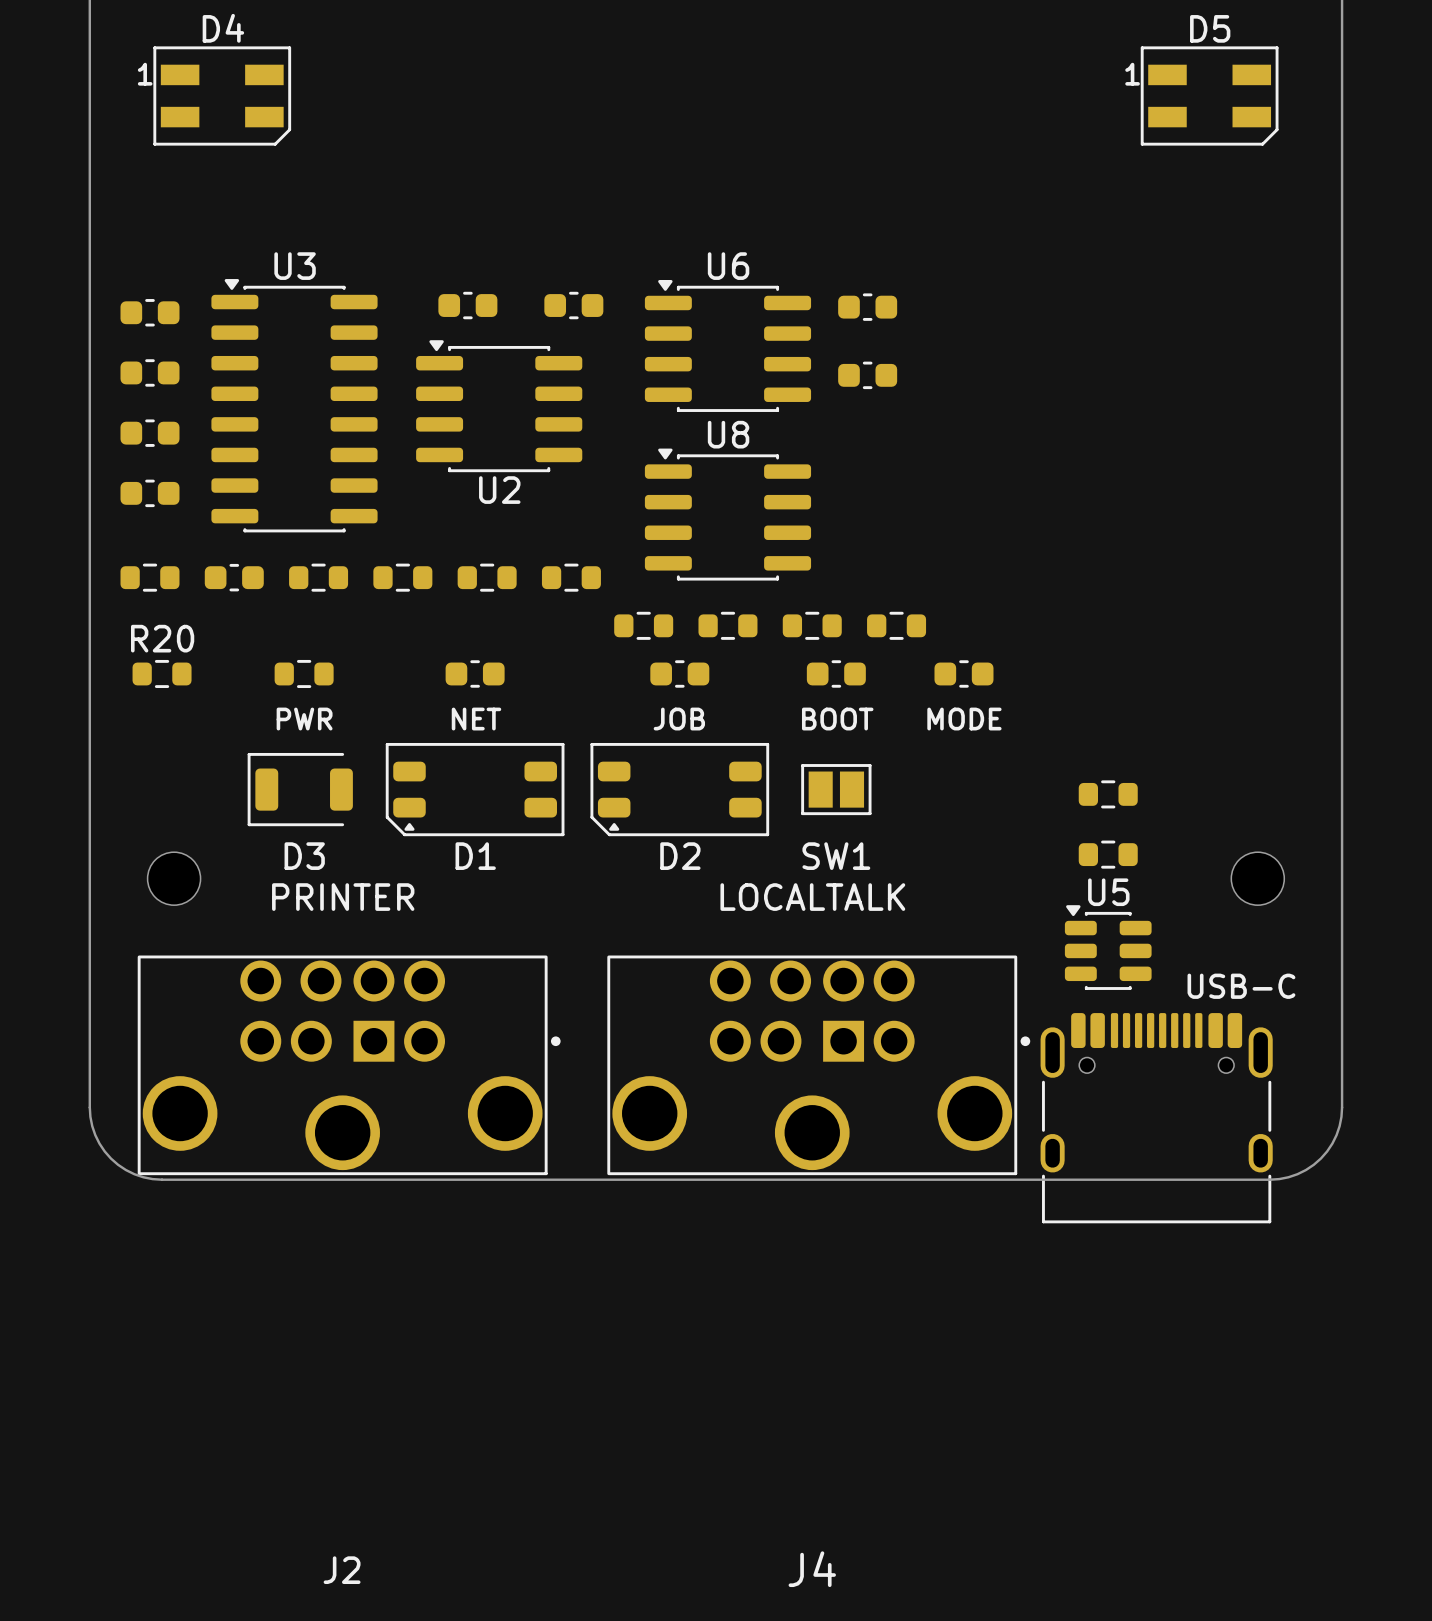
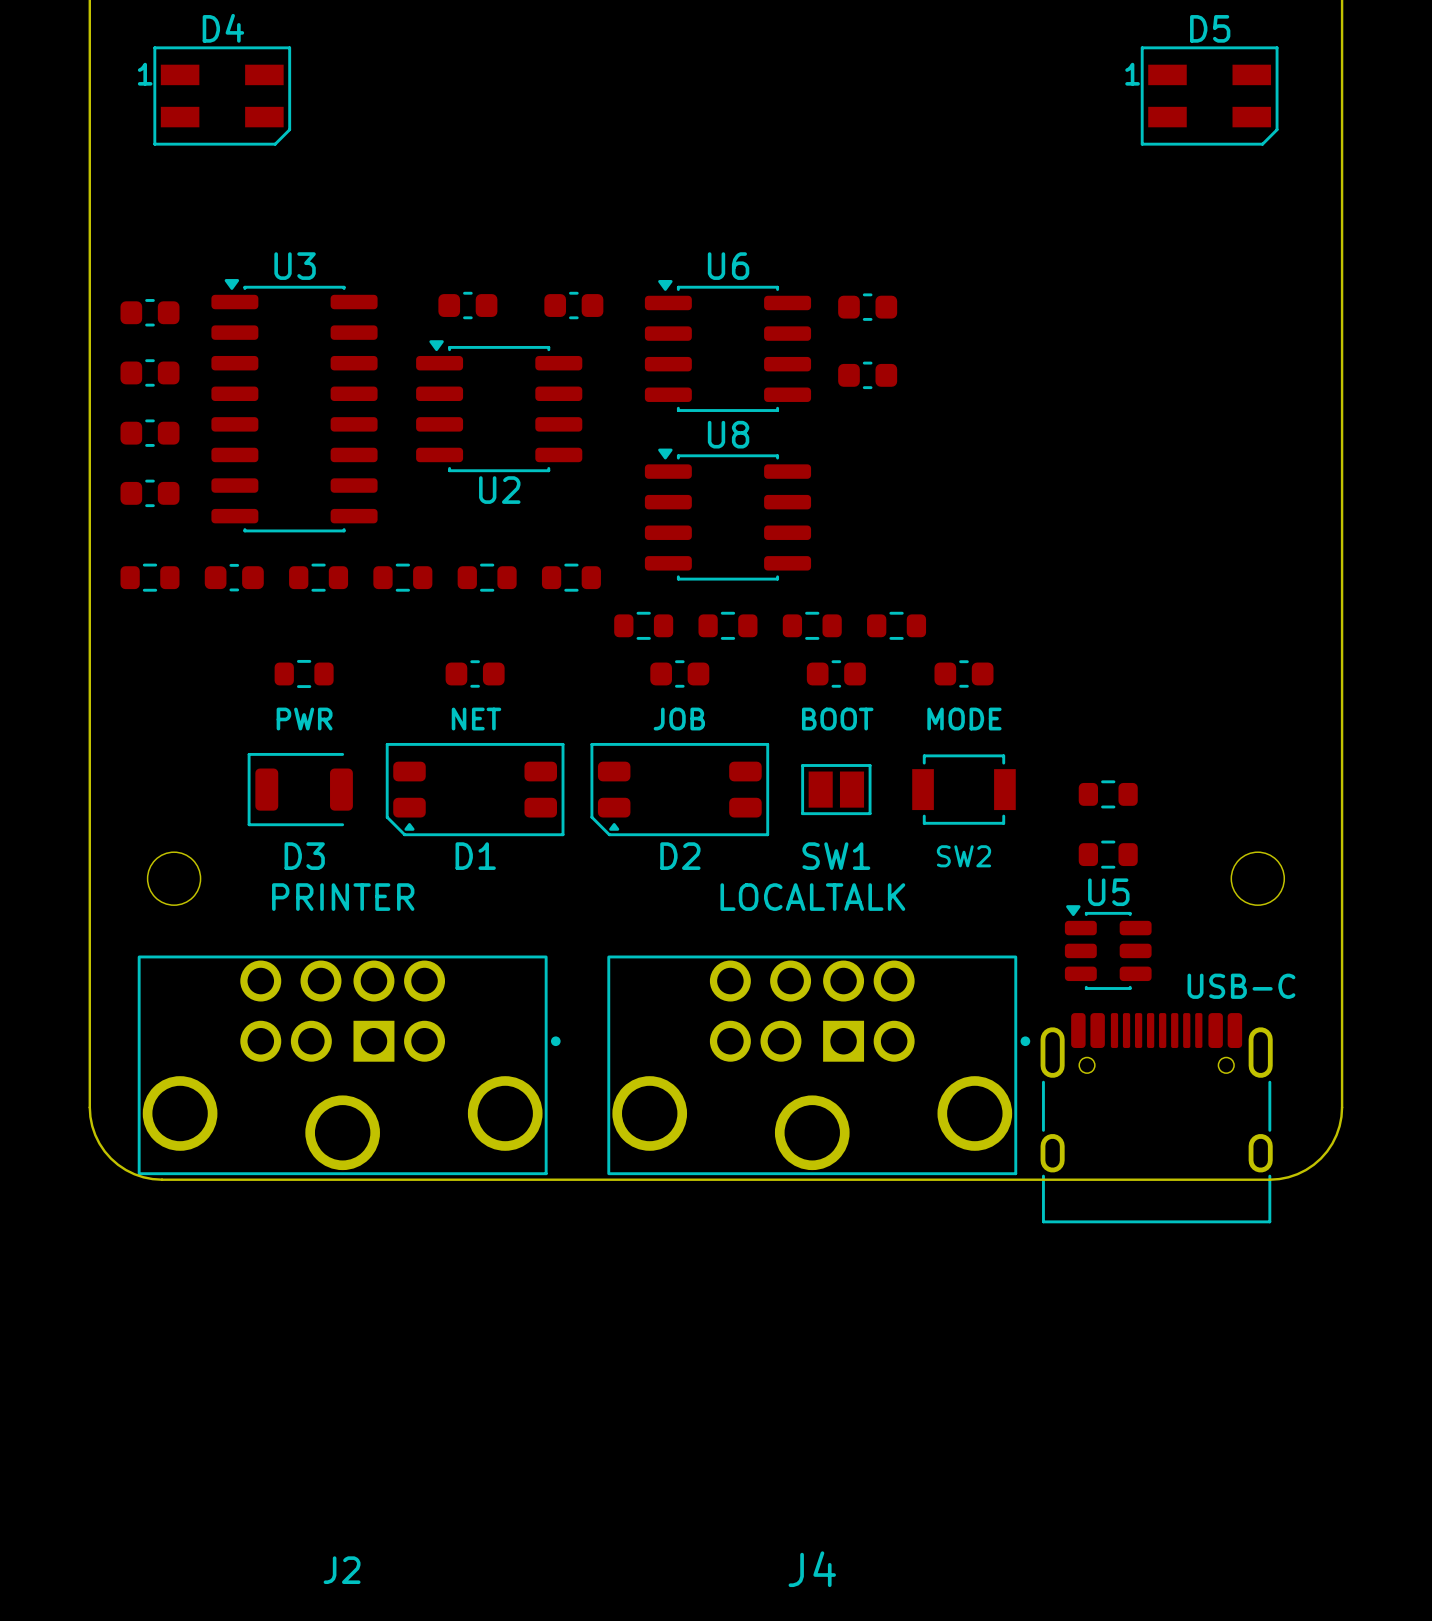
R20: (162, 673) -> none
SW2: none -> (963, 789)

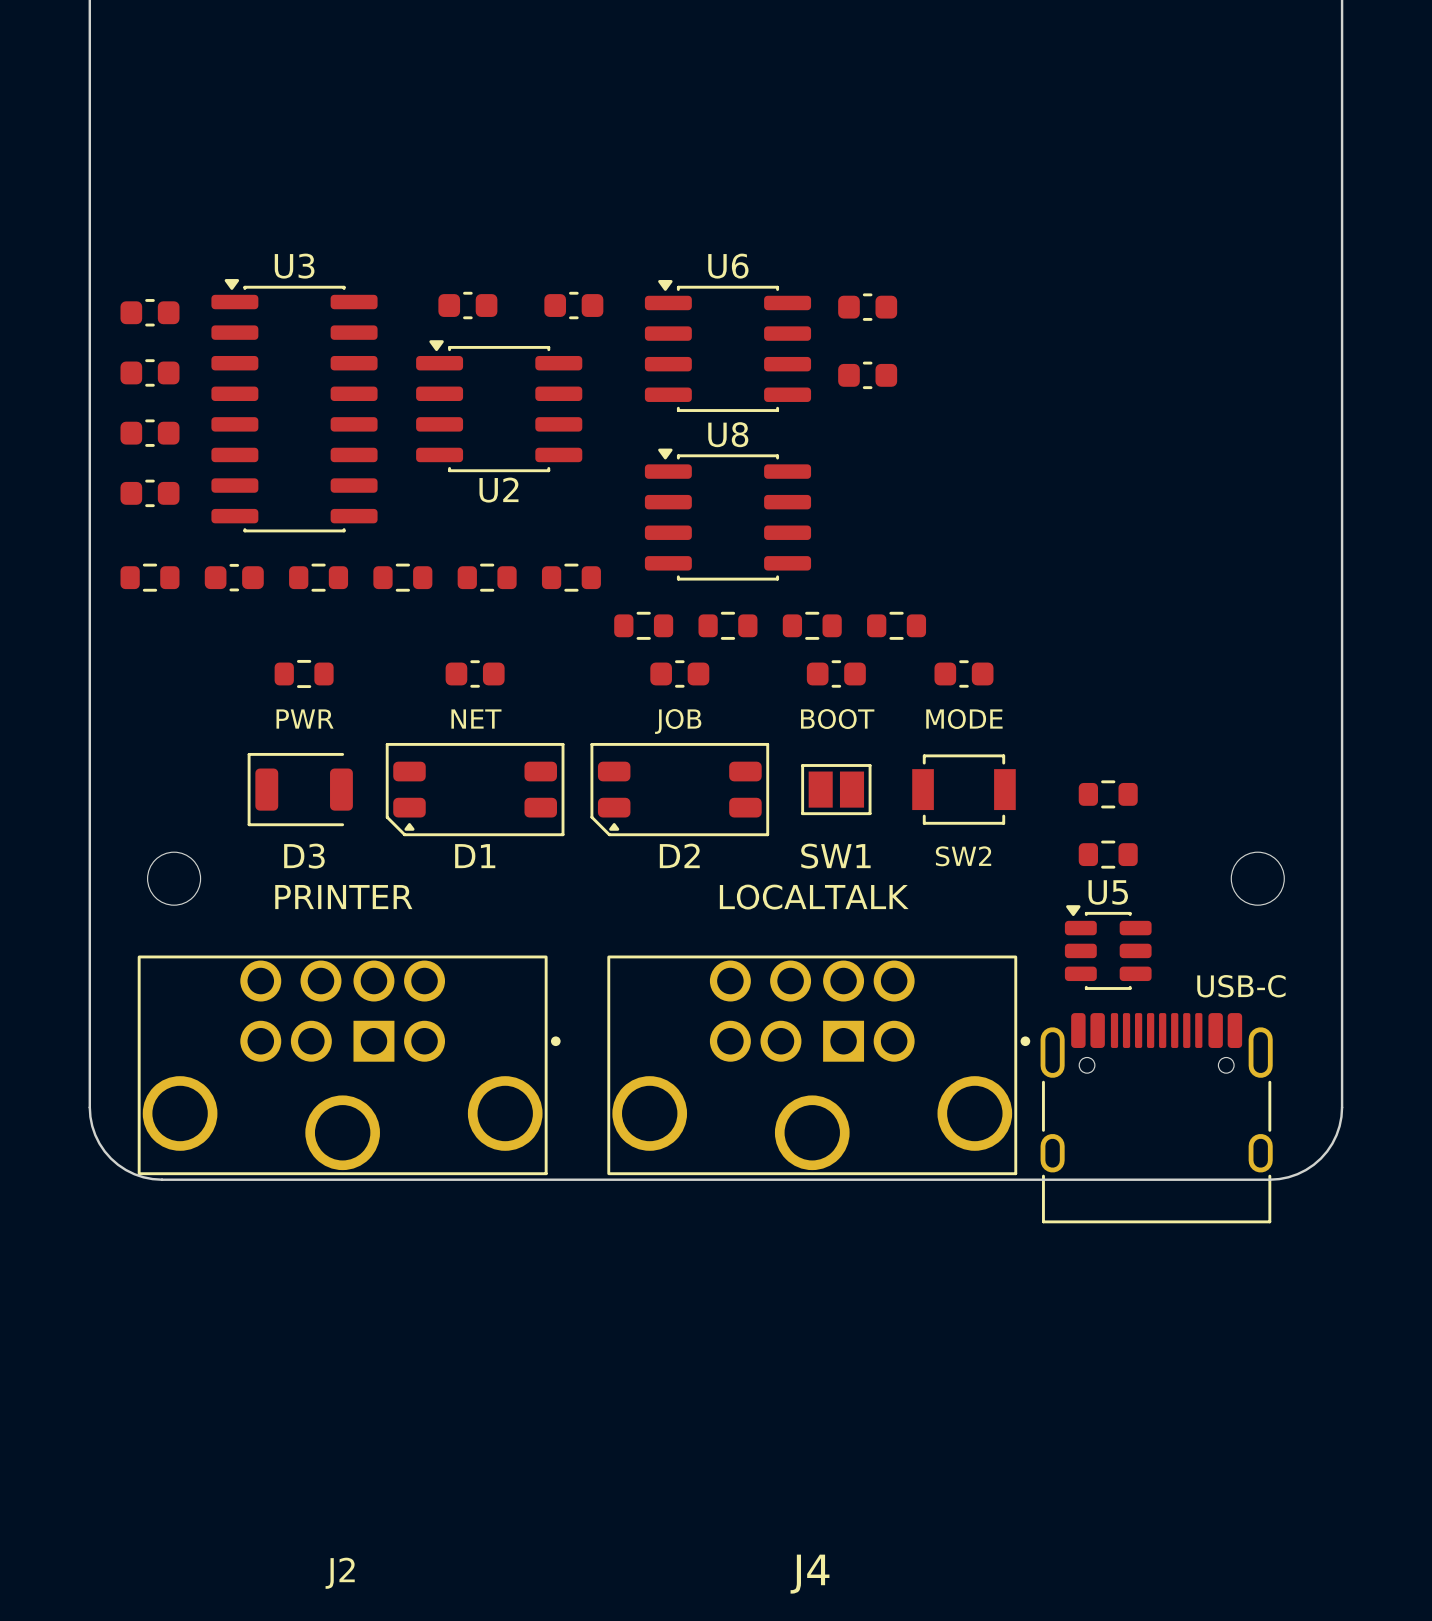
D4: (222, 96) -> none
D5: (1209, 96) -> none

